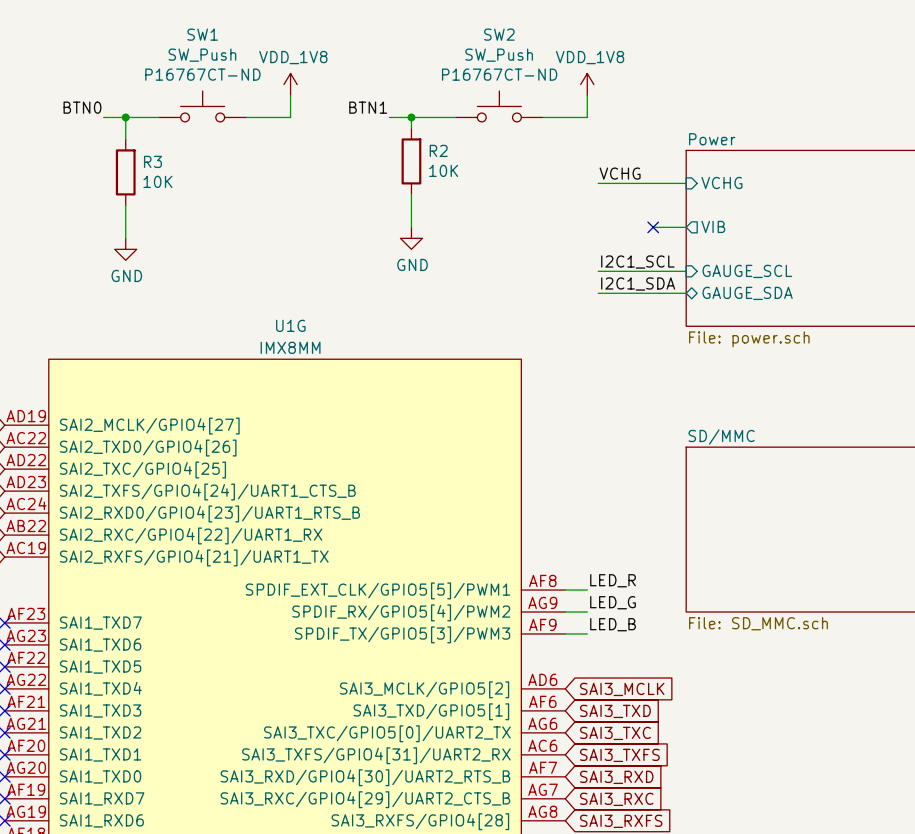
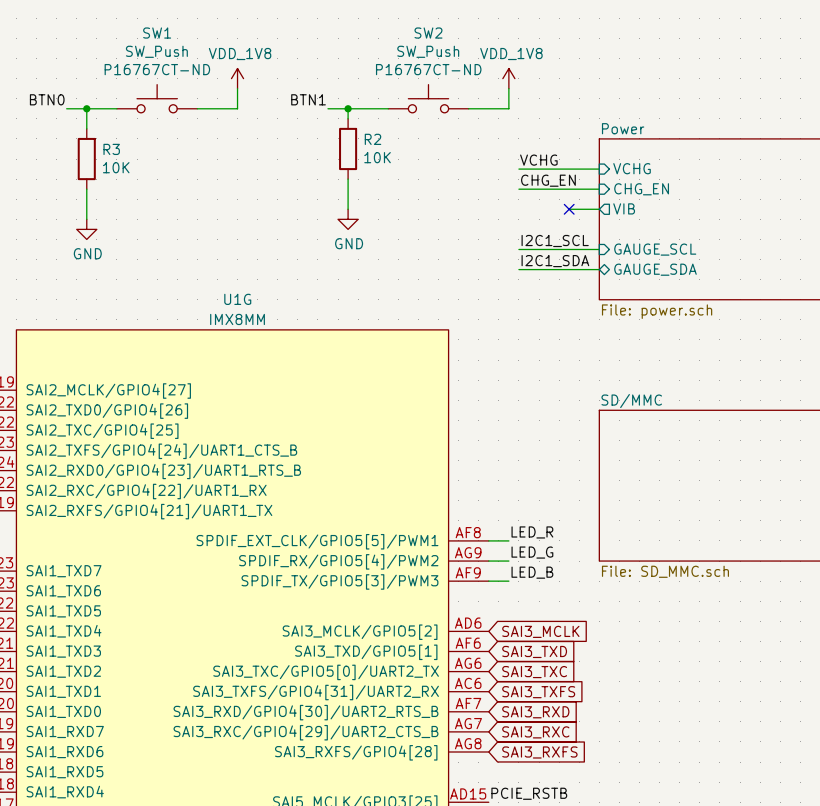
label: none -> CHG_EN (548, 180)
wire: none -> (518, 189) (599, 189)
sheet pin: none -> CHG_EN (641, 189)

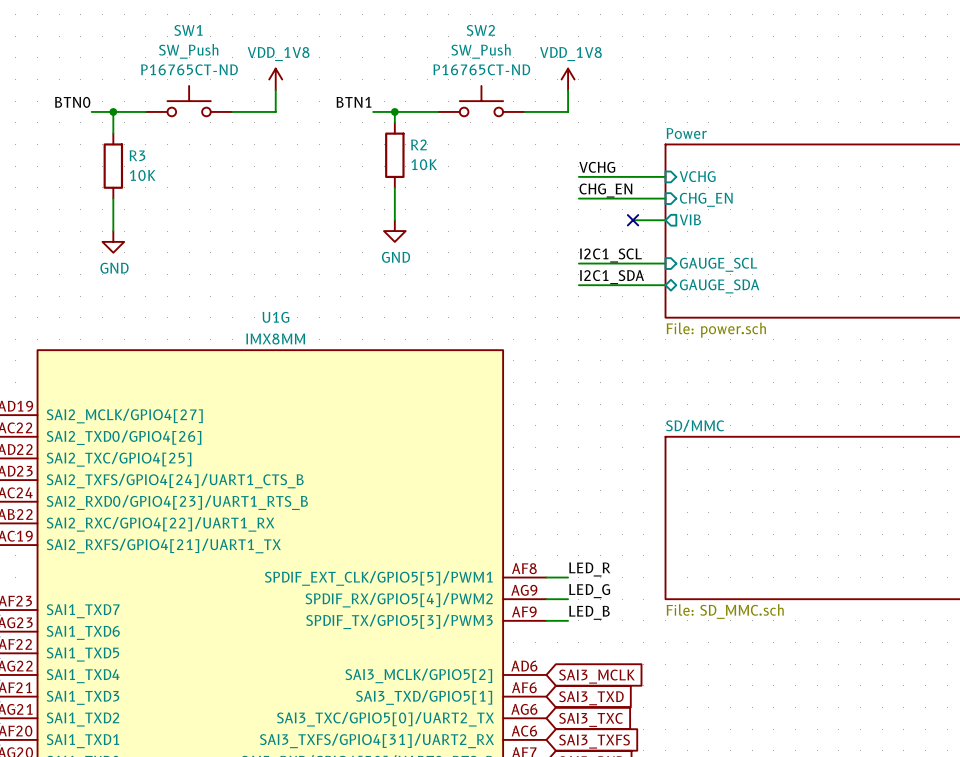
SW1 text: P16767CT-ND (157, 69) -> P16765CT-ND (189, 69)
SW2 text: P16767CT-ND (428, 69) -> P16765CT-ND (481, 69)

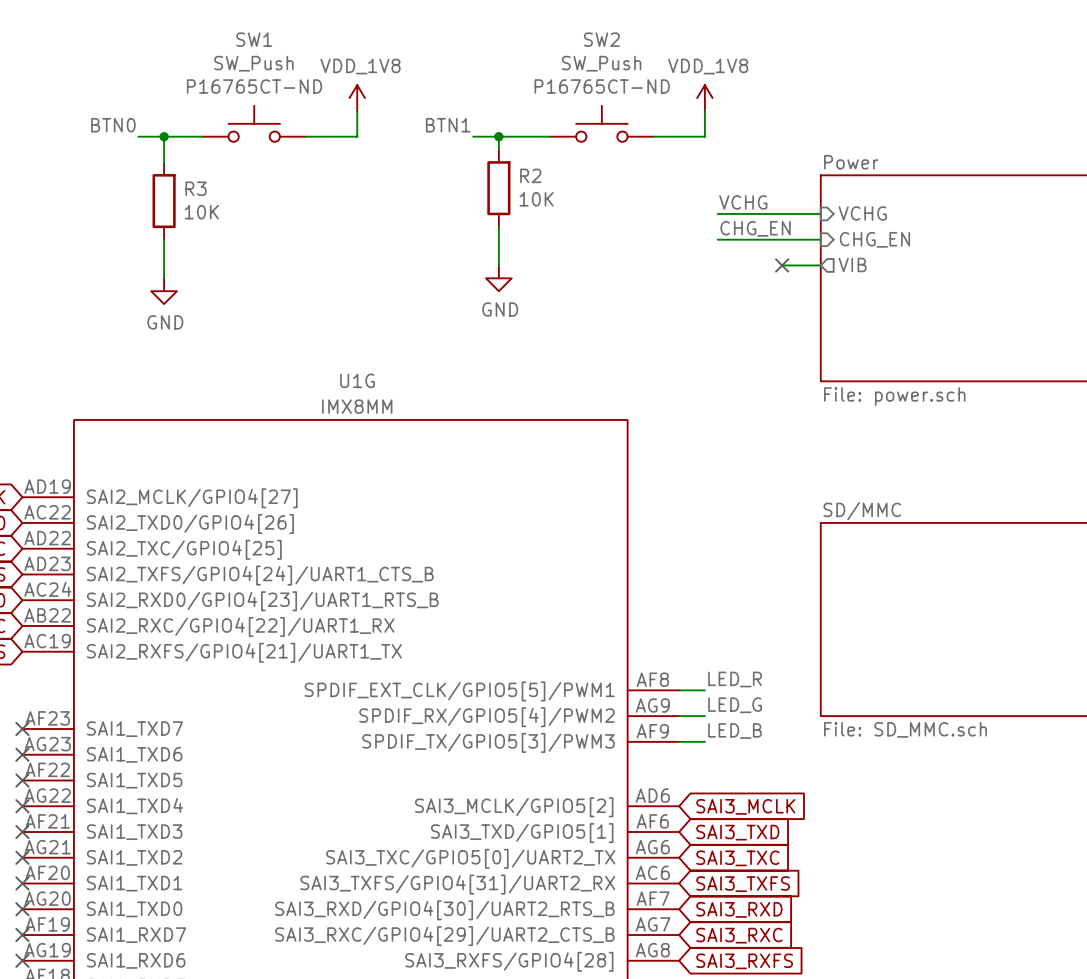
label: I2C1_SCL (610, 255) -> none
wire: (578, 263) (665, 263) -> none
sheet pin: GAUGE_SCL (718, 264) -> none
label: I2C1_SDA (612, 277) -> none
wire: (578, 285) (665, 285) -> none
sheet pin: GAUGE_SDA (719, 286) -> none

